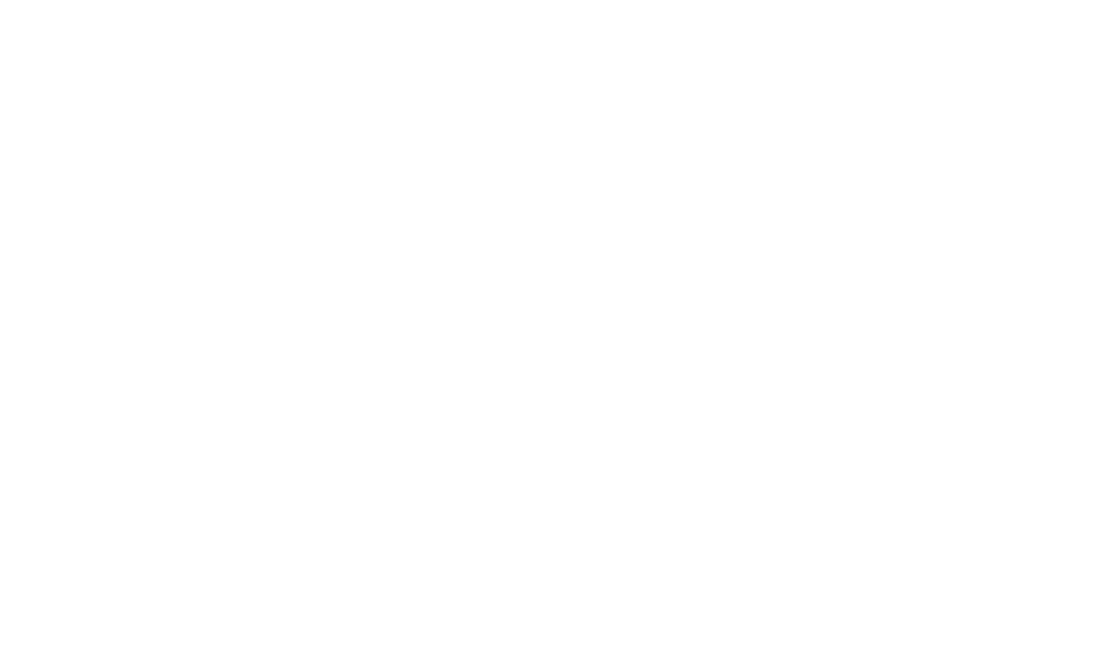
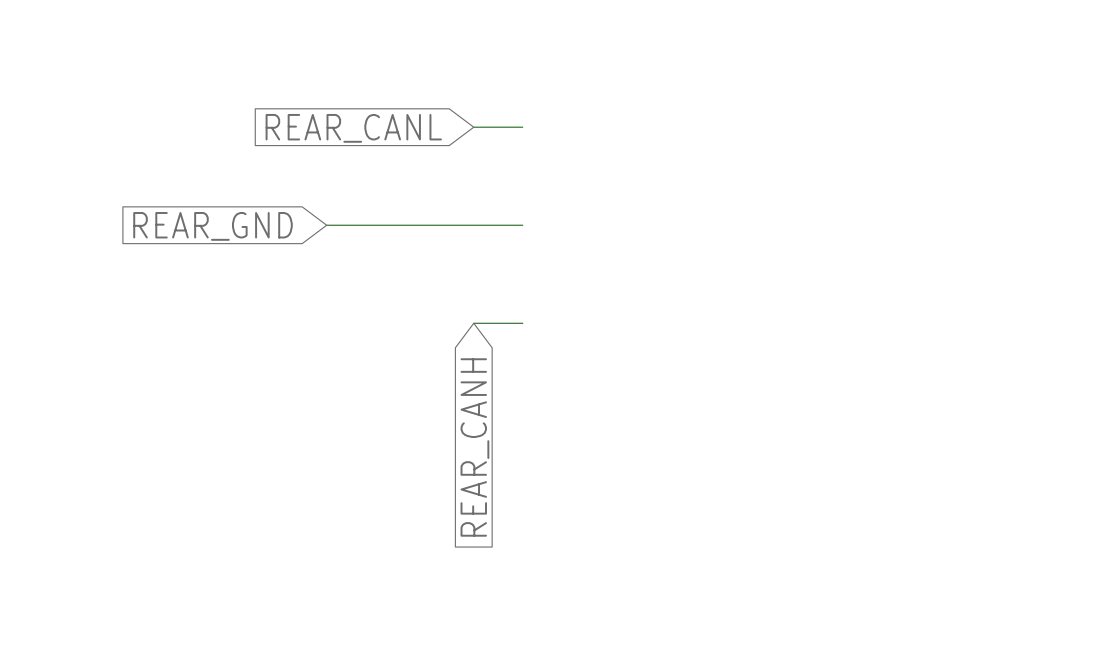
wire: none -> (473, 127) (522, 127)
global label: none -> REAR_CANL (353, 128)
wire: none -> (326, 225) (522, 225)
global label: none -> REAR_GND (213, 226)
wire: none -> (473, 323) (522, 323)
global label: none -> REAR_CANH (474, 447)

